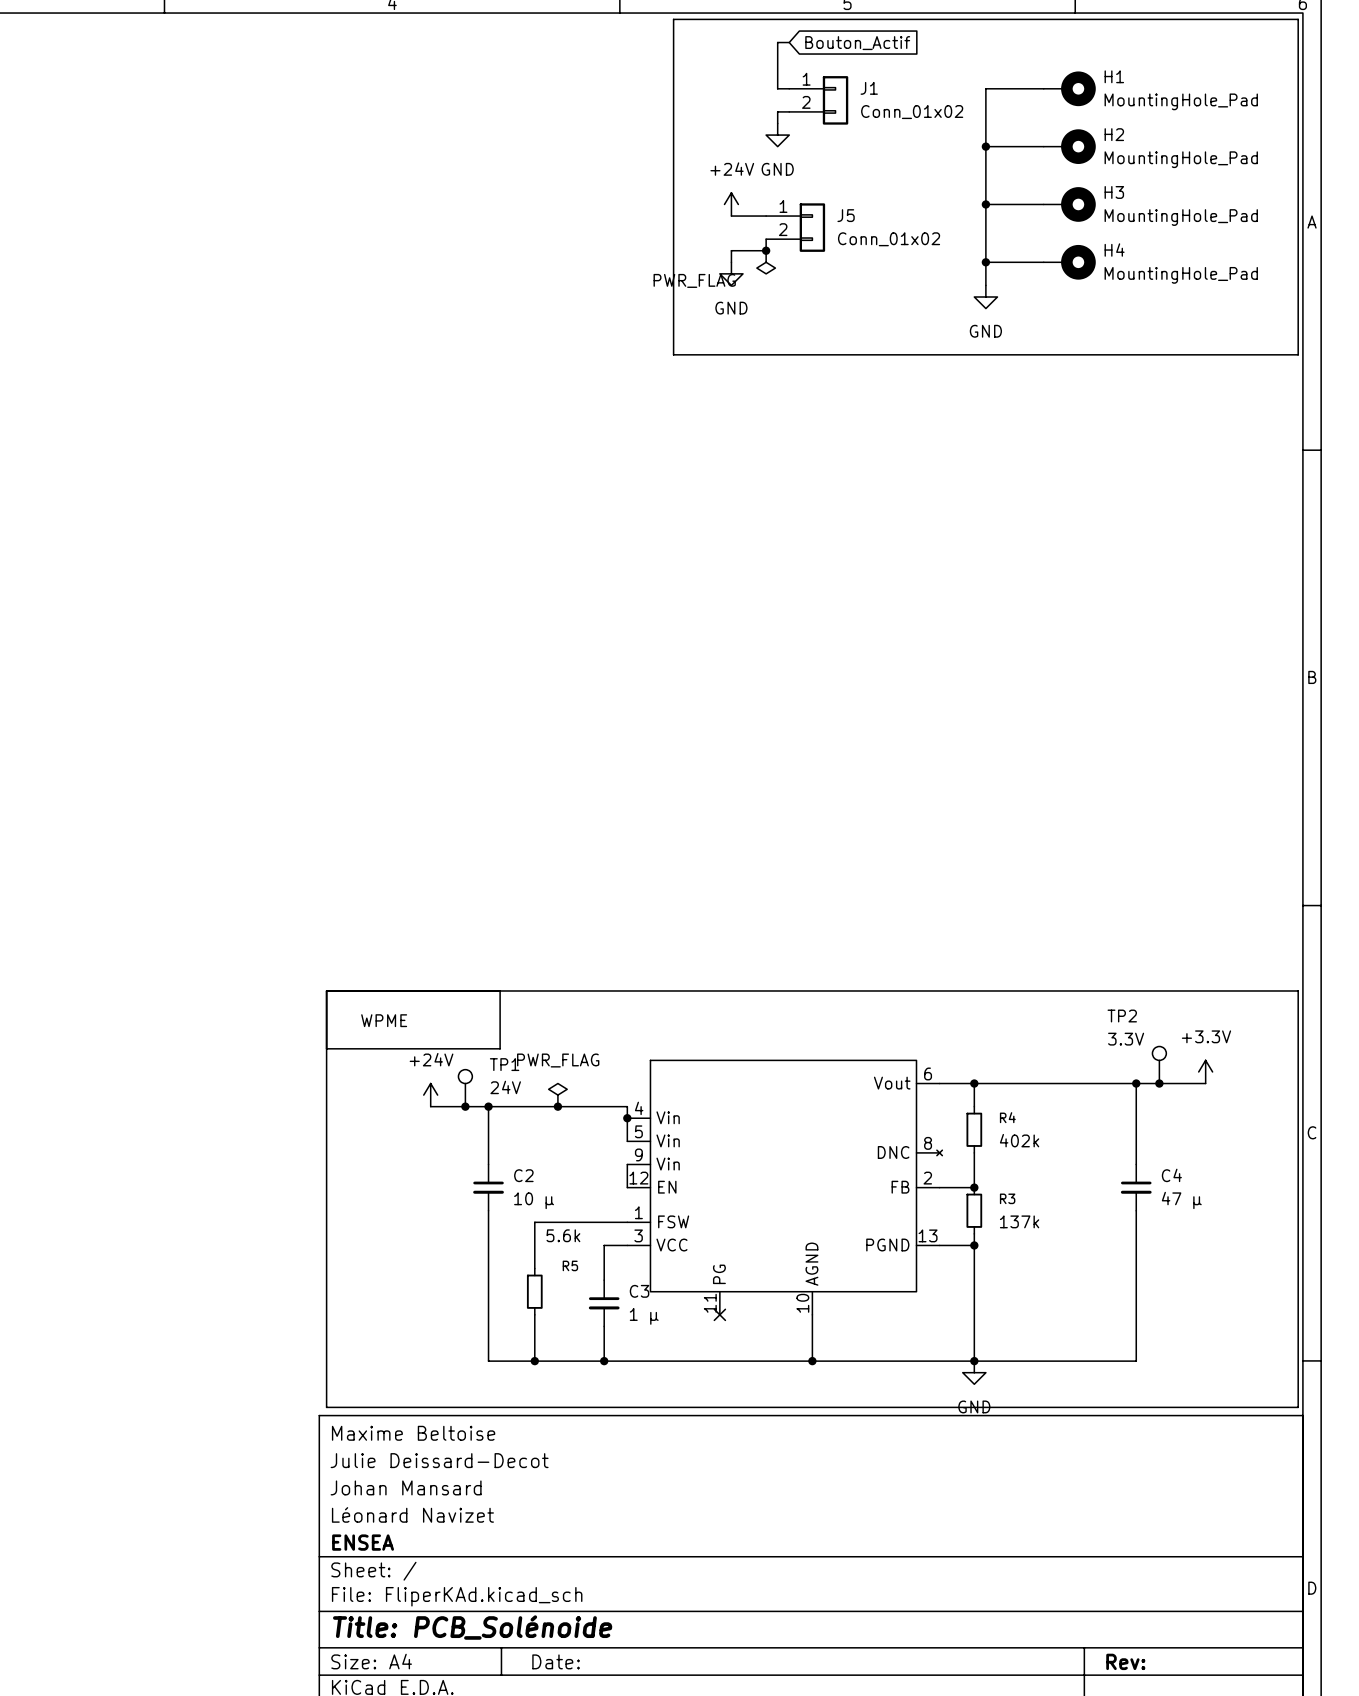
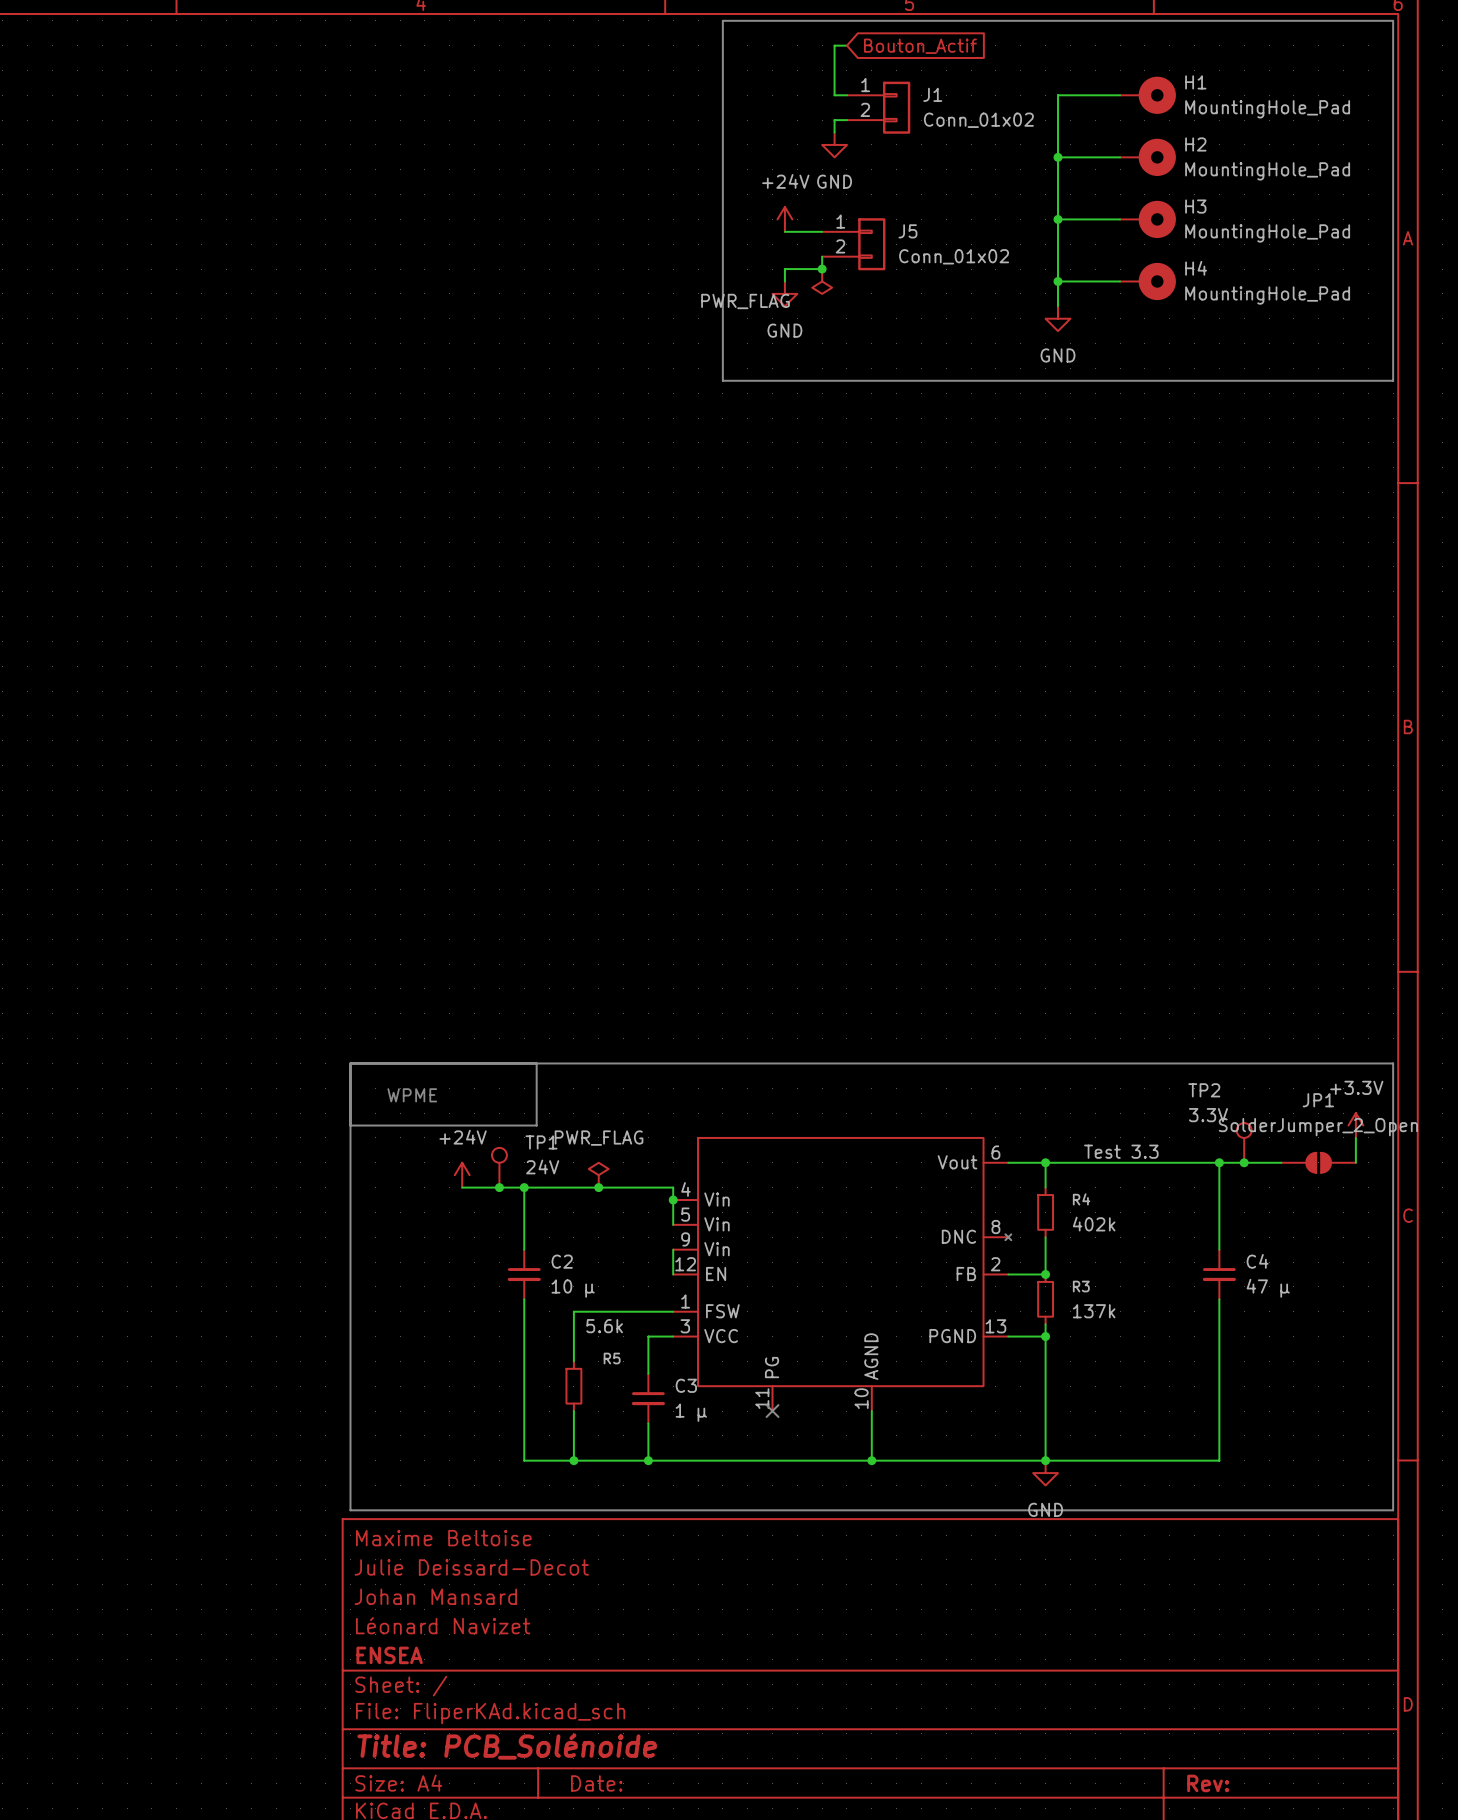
wire: none -> (1355, 1137) (1355, 1162)
power symbol position: +3.3V (1205, 1071) -> +3.3V (1355, 1125)
label: none -> Test 3.3 (1121, 1151)
JP1: none -> SolderJumper_2_Open (1318, 1162)

